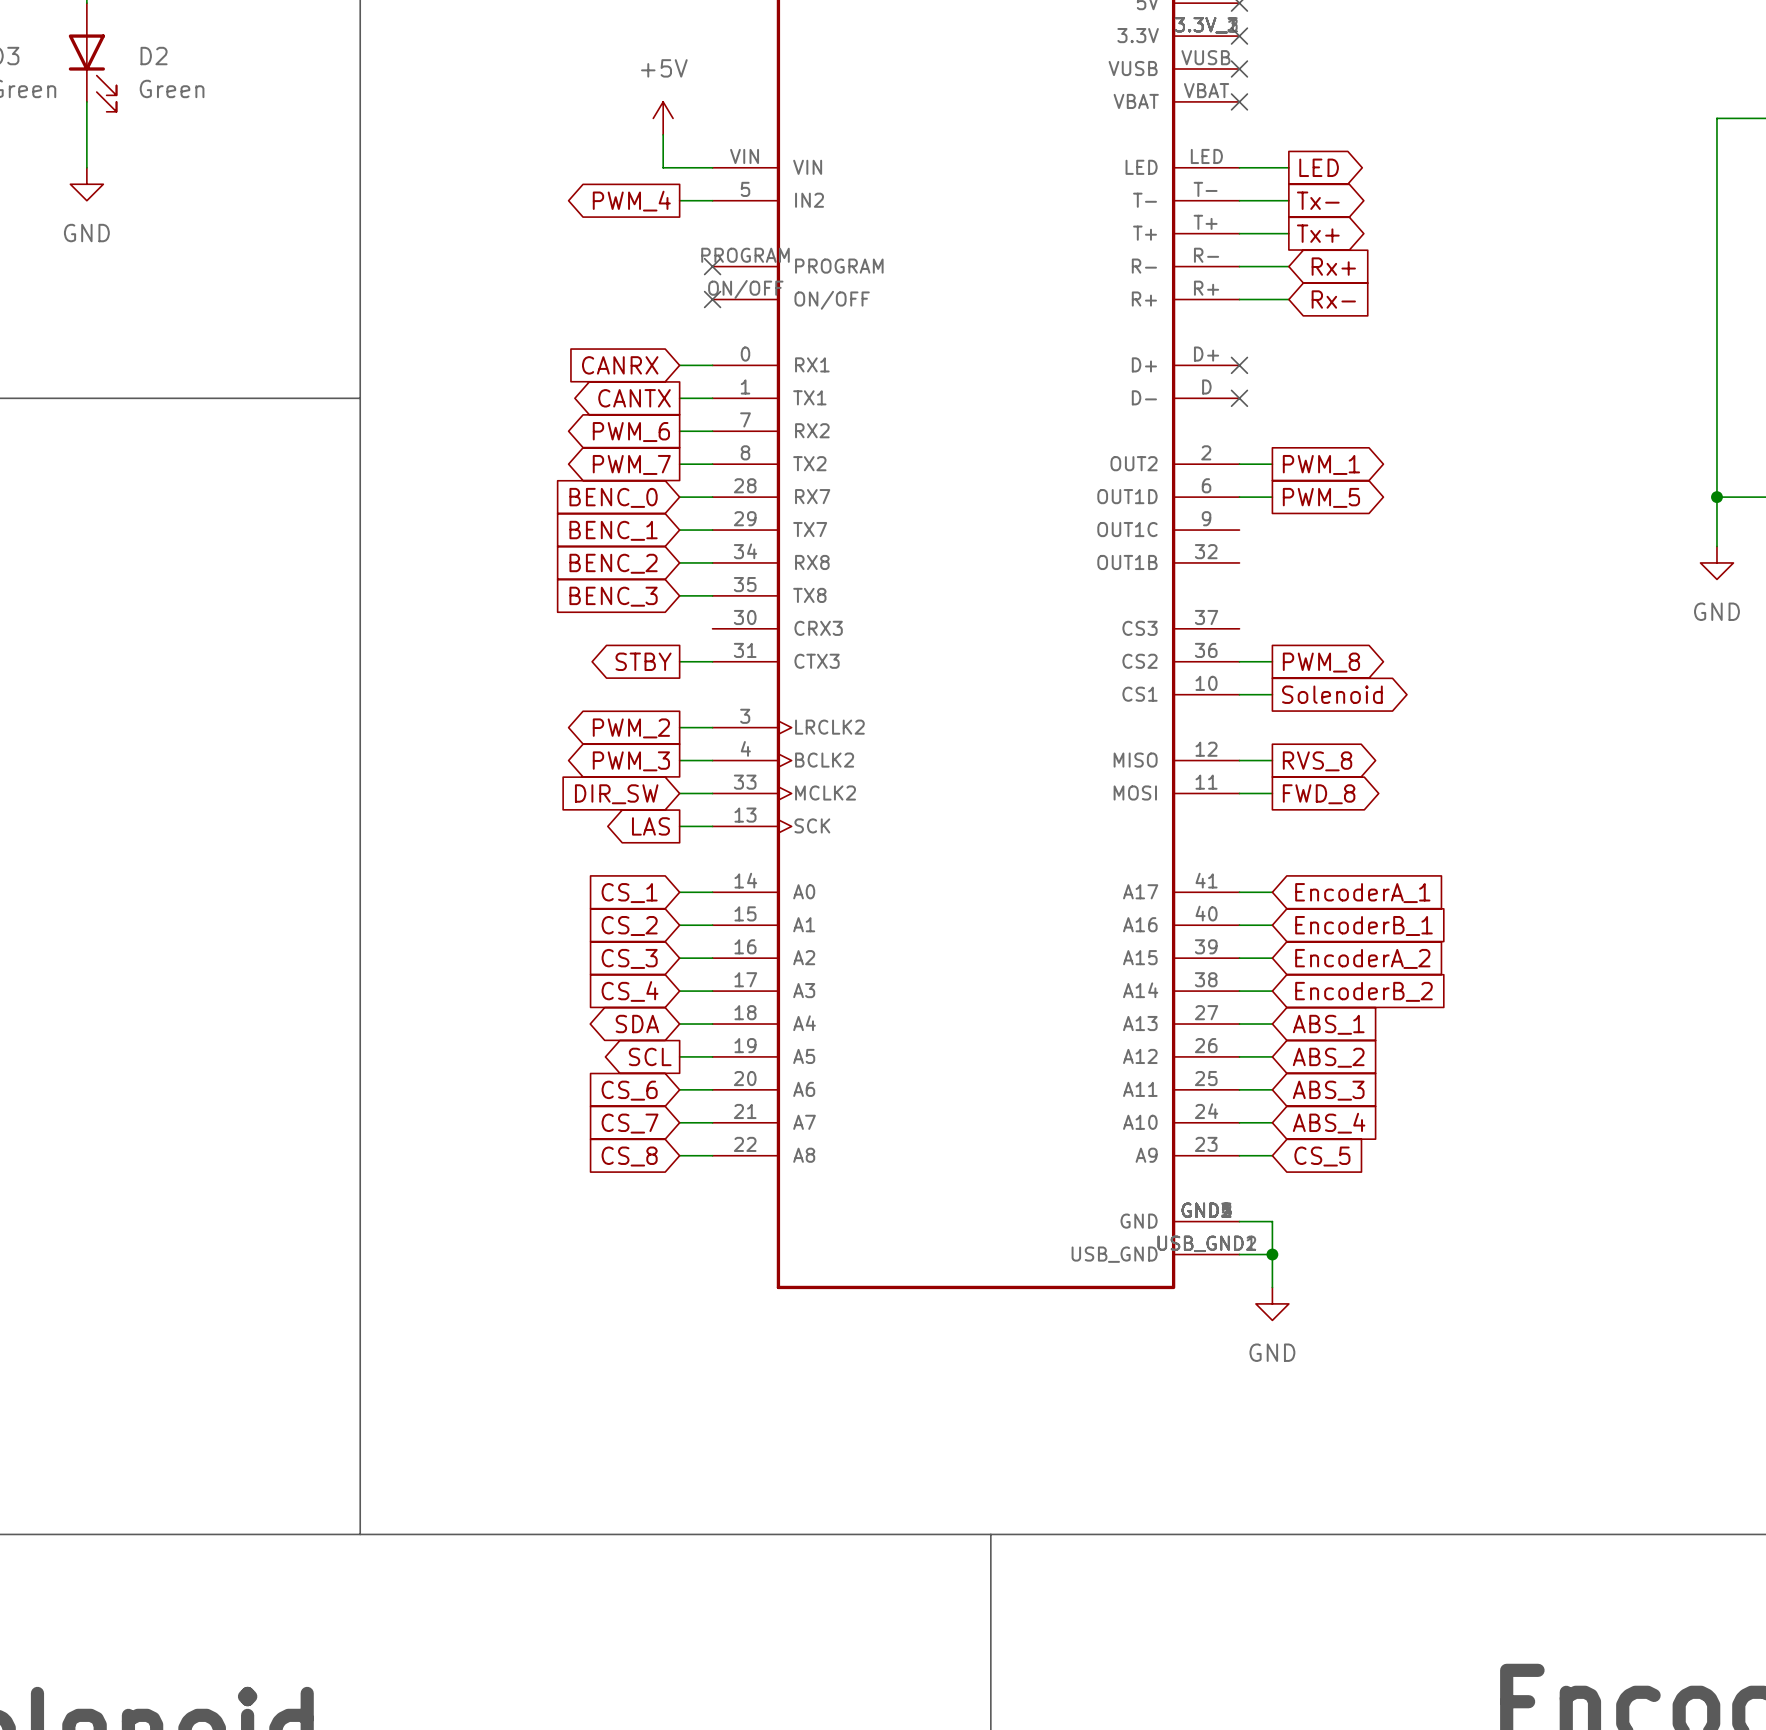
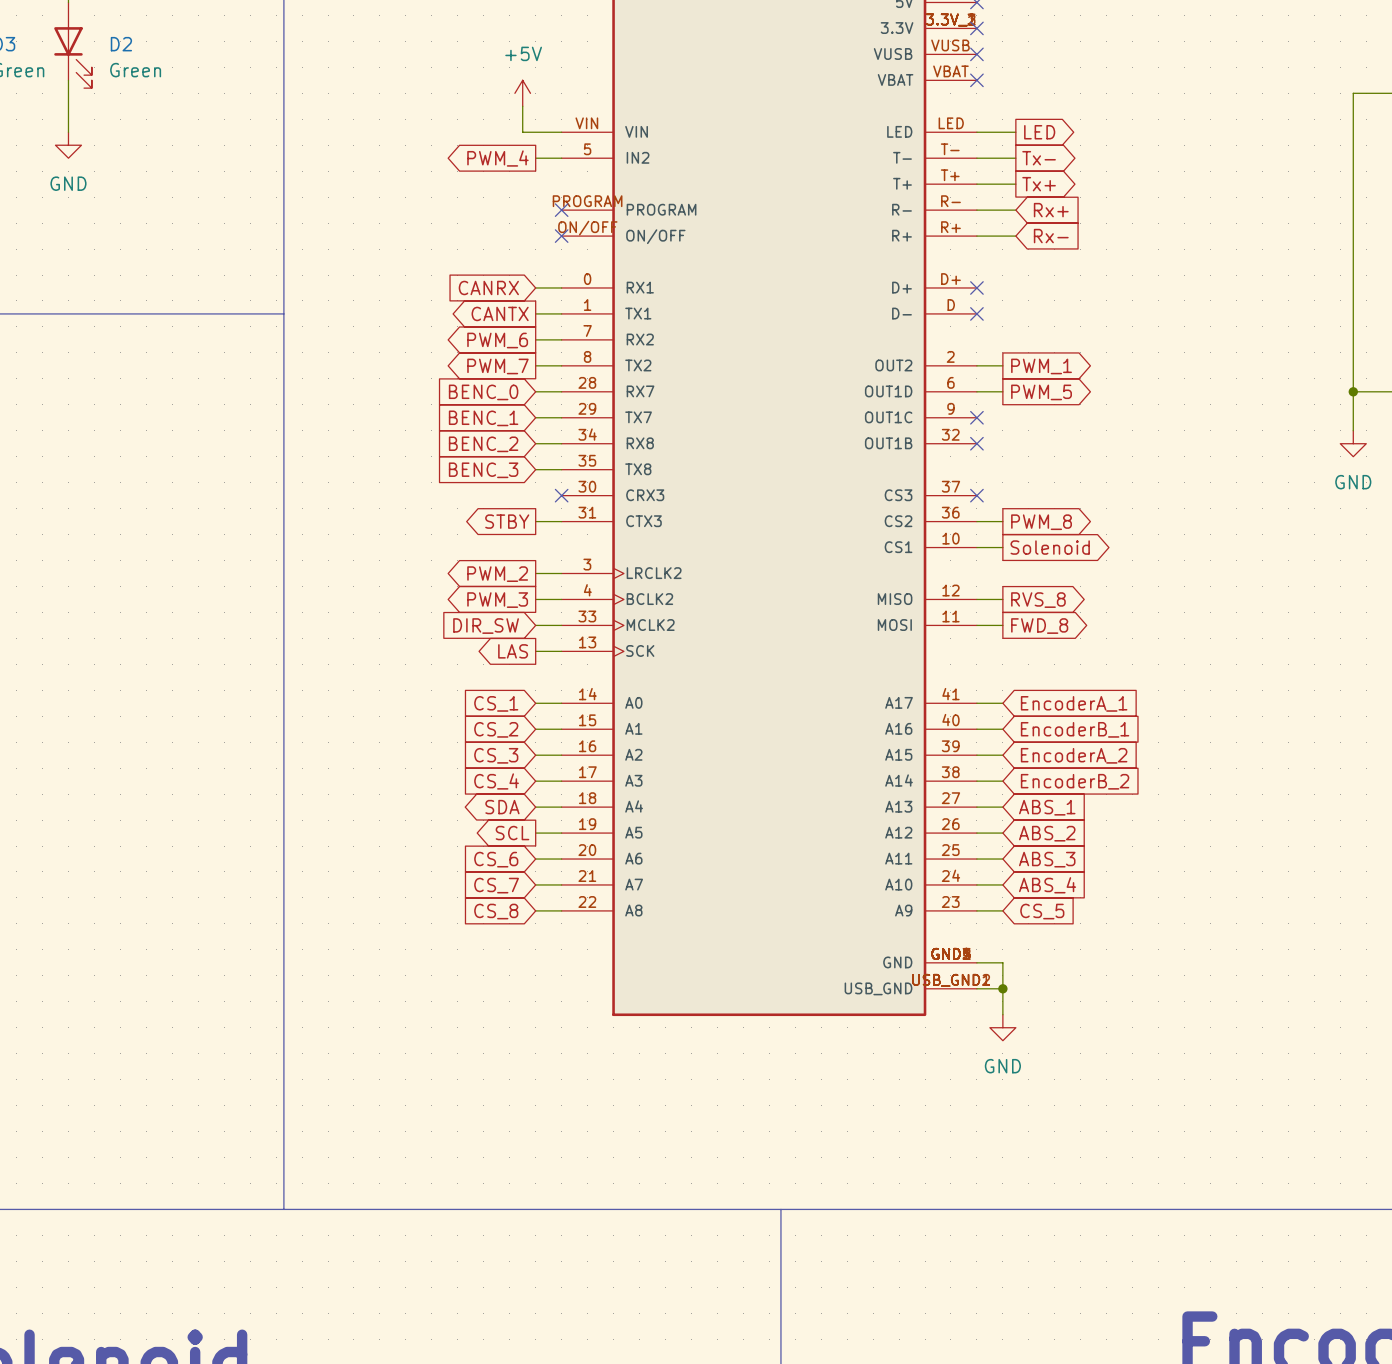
no-connect mark: none -> (976, 417)
no-connect mark: none -> (976, 443)
no-connect mark: none -> (561, 495)
no-connect mark: none -> (976, 495)

